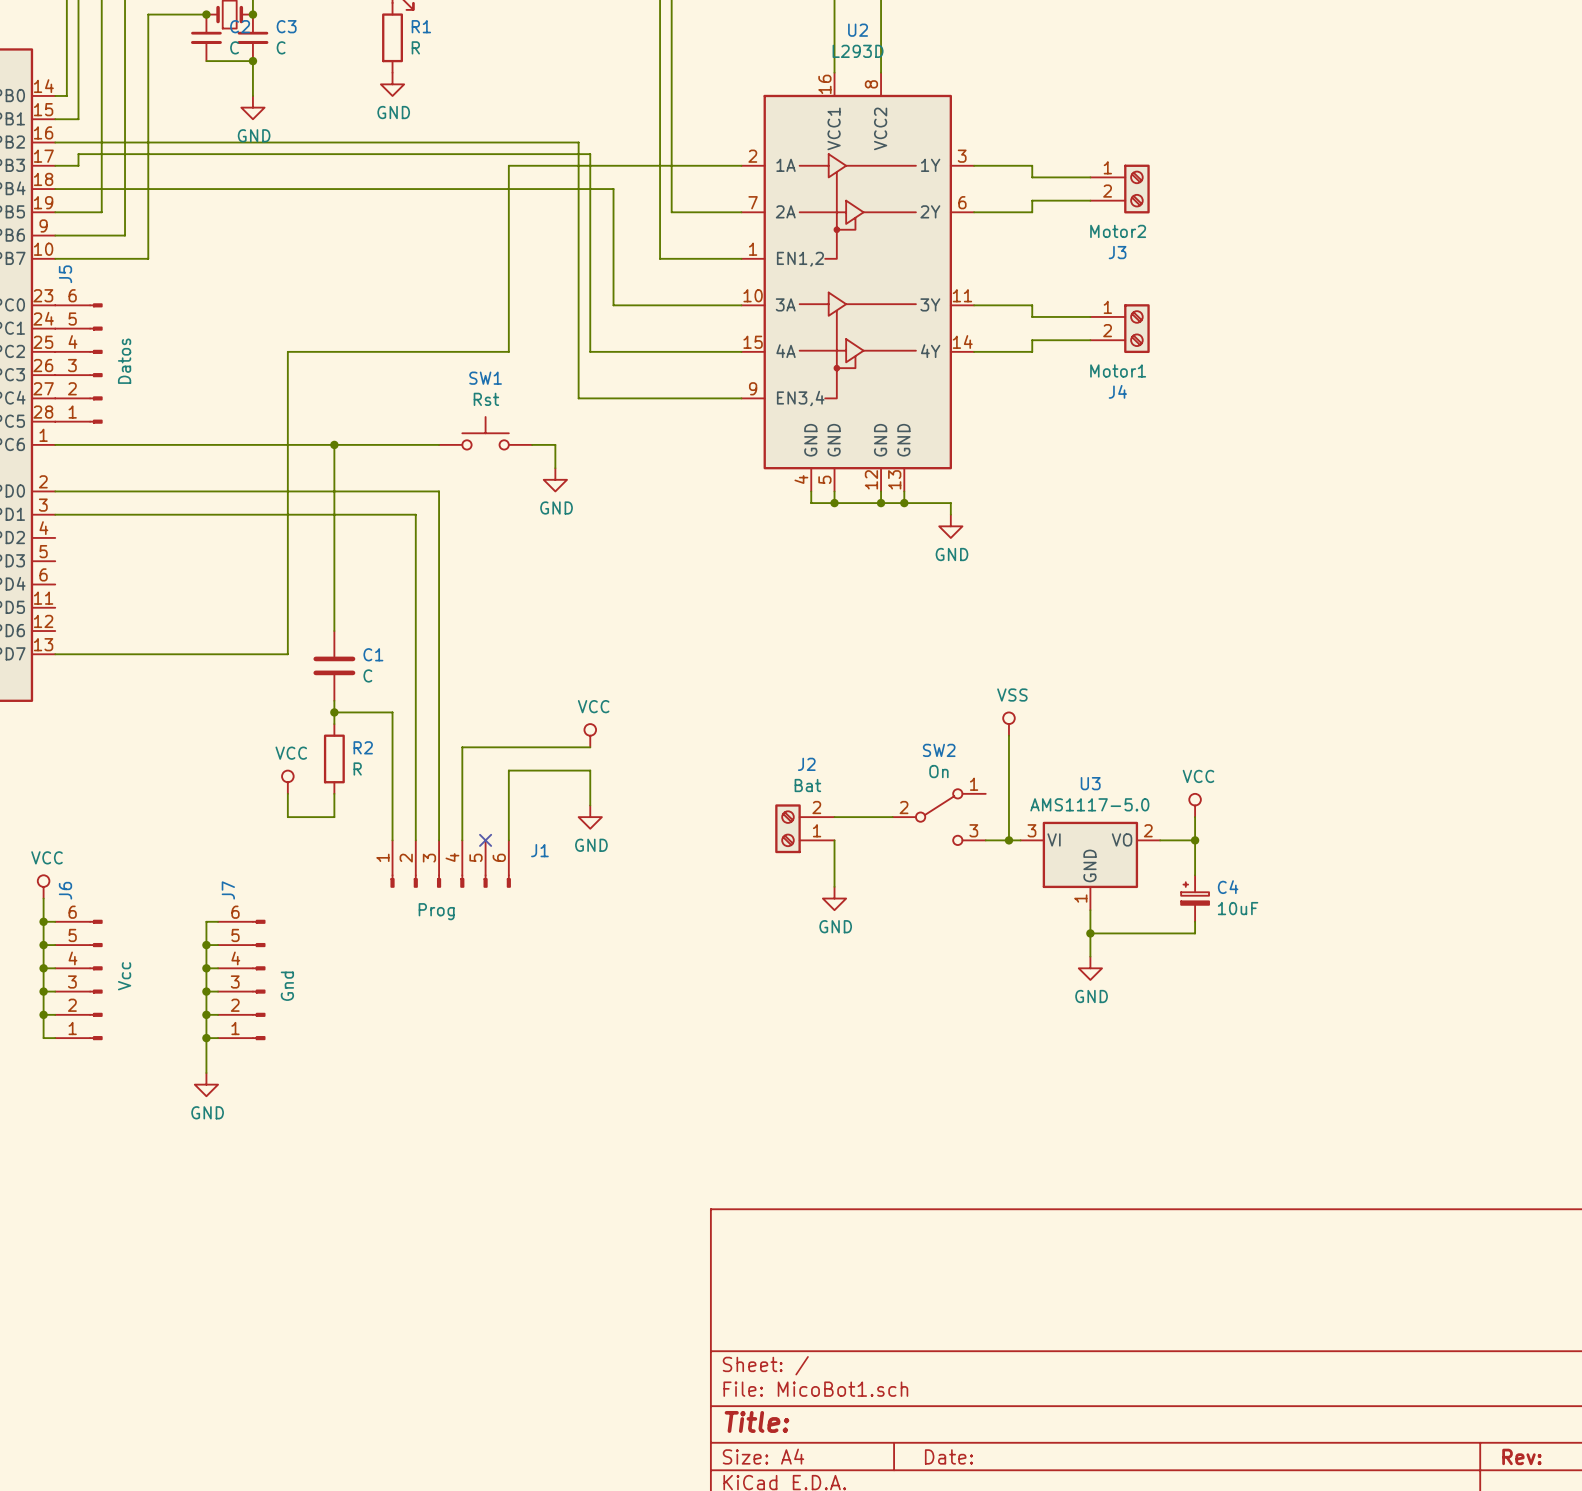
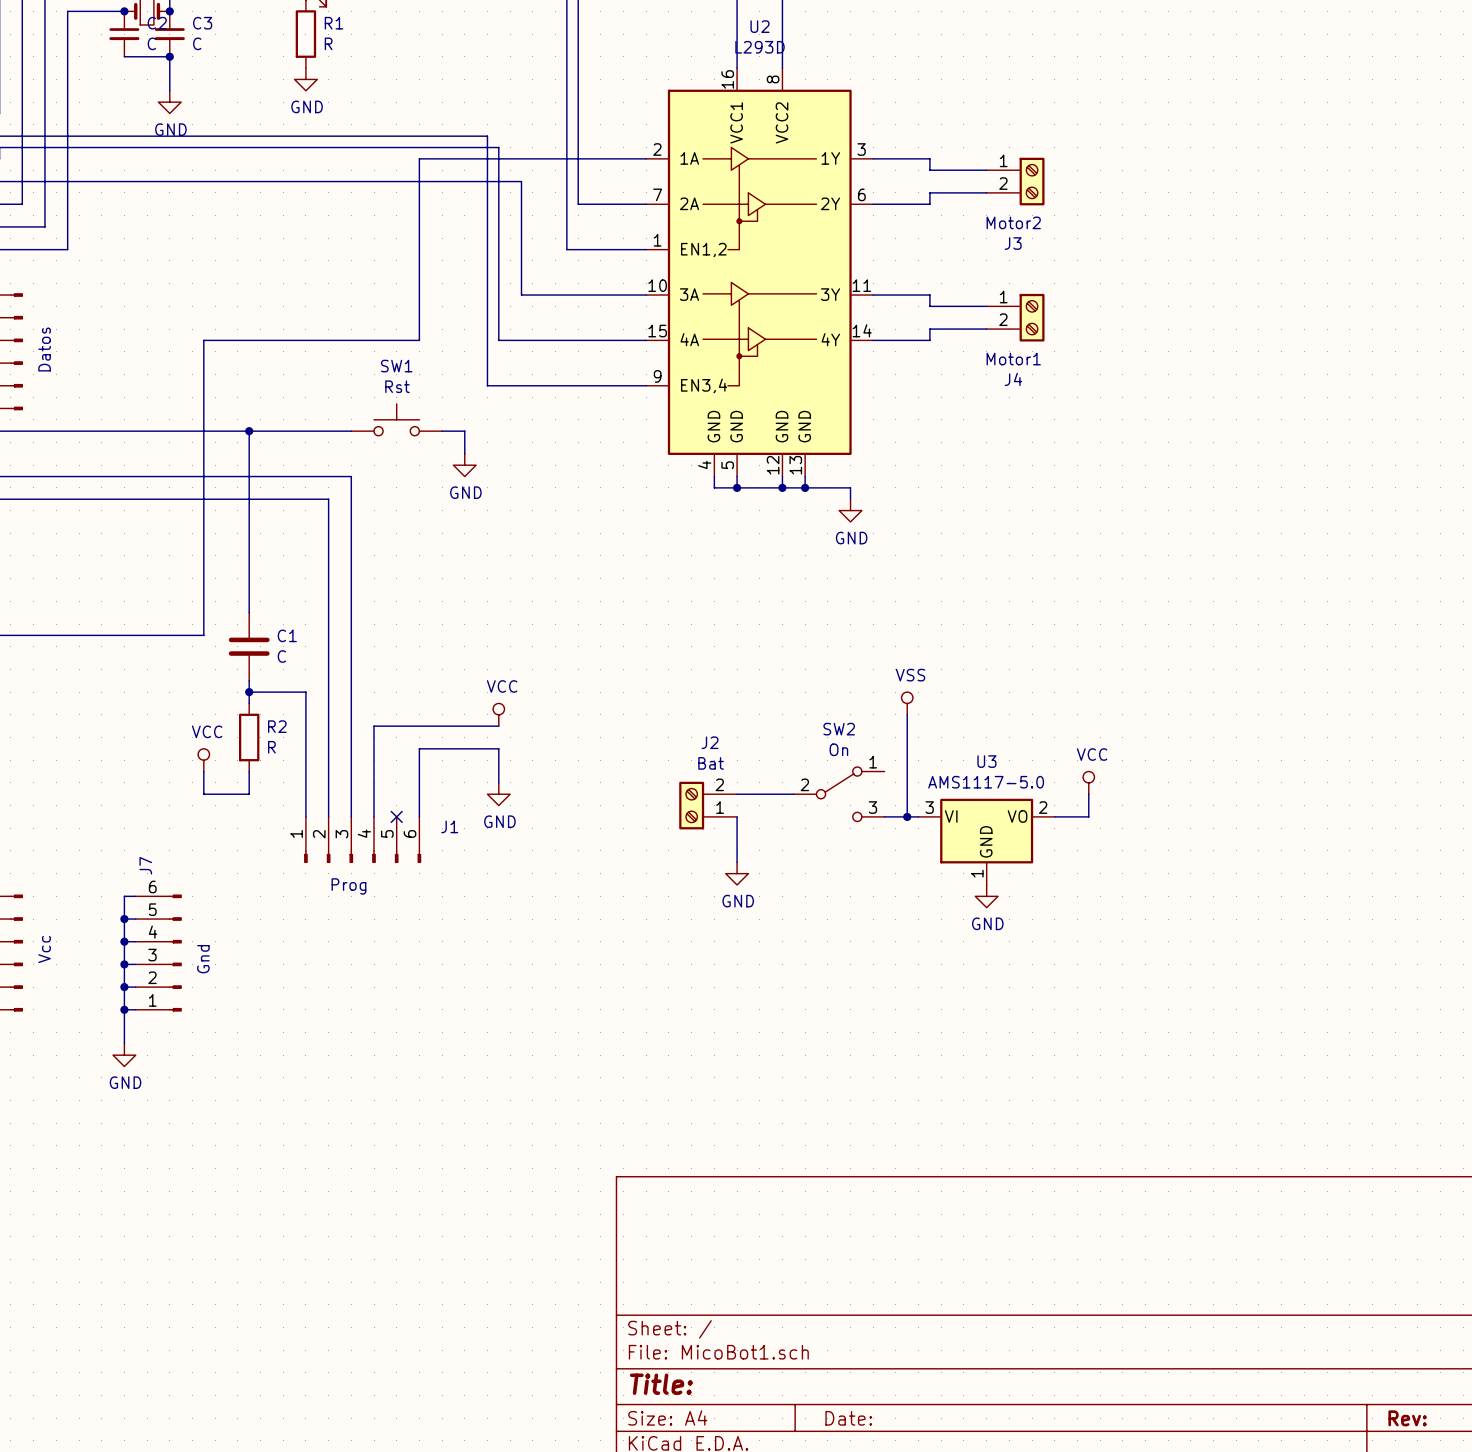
wire: (1195, 840) (1195, 875) -> none
junction: (1195, 840) -> none
C4: 10uF (1195, 898) -> none
wire: (1090, 910) (1090, 956) -> none
wire: (1195, 921) (1195, 933) (1090, 933) -> none
junction: (1090, 933) -> none
power symbol position: GND (1090, 968) -> GND (986, 896)

